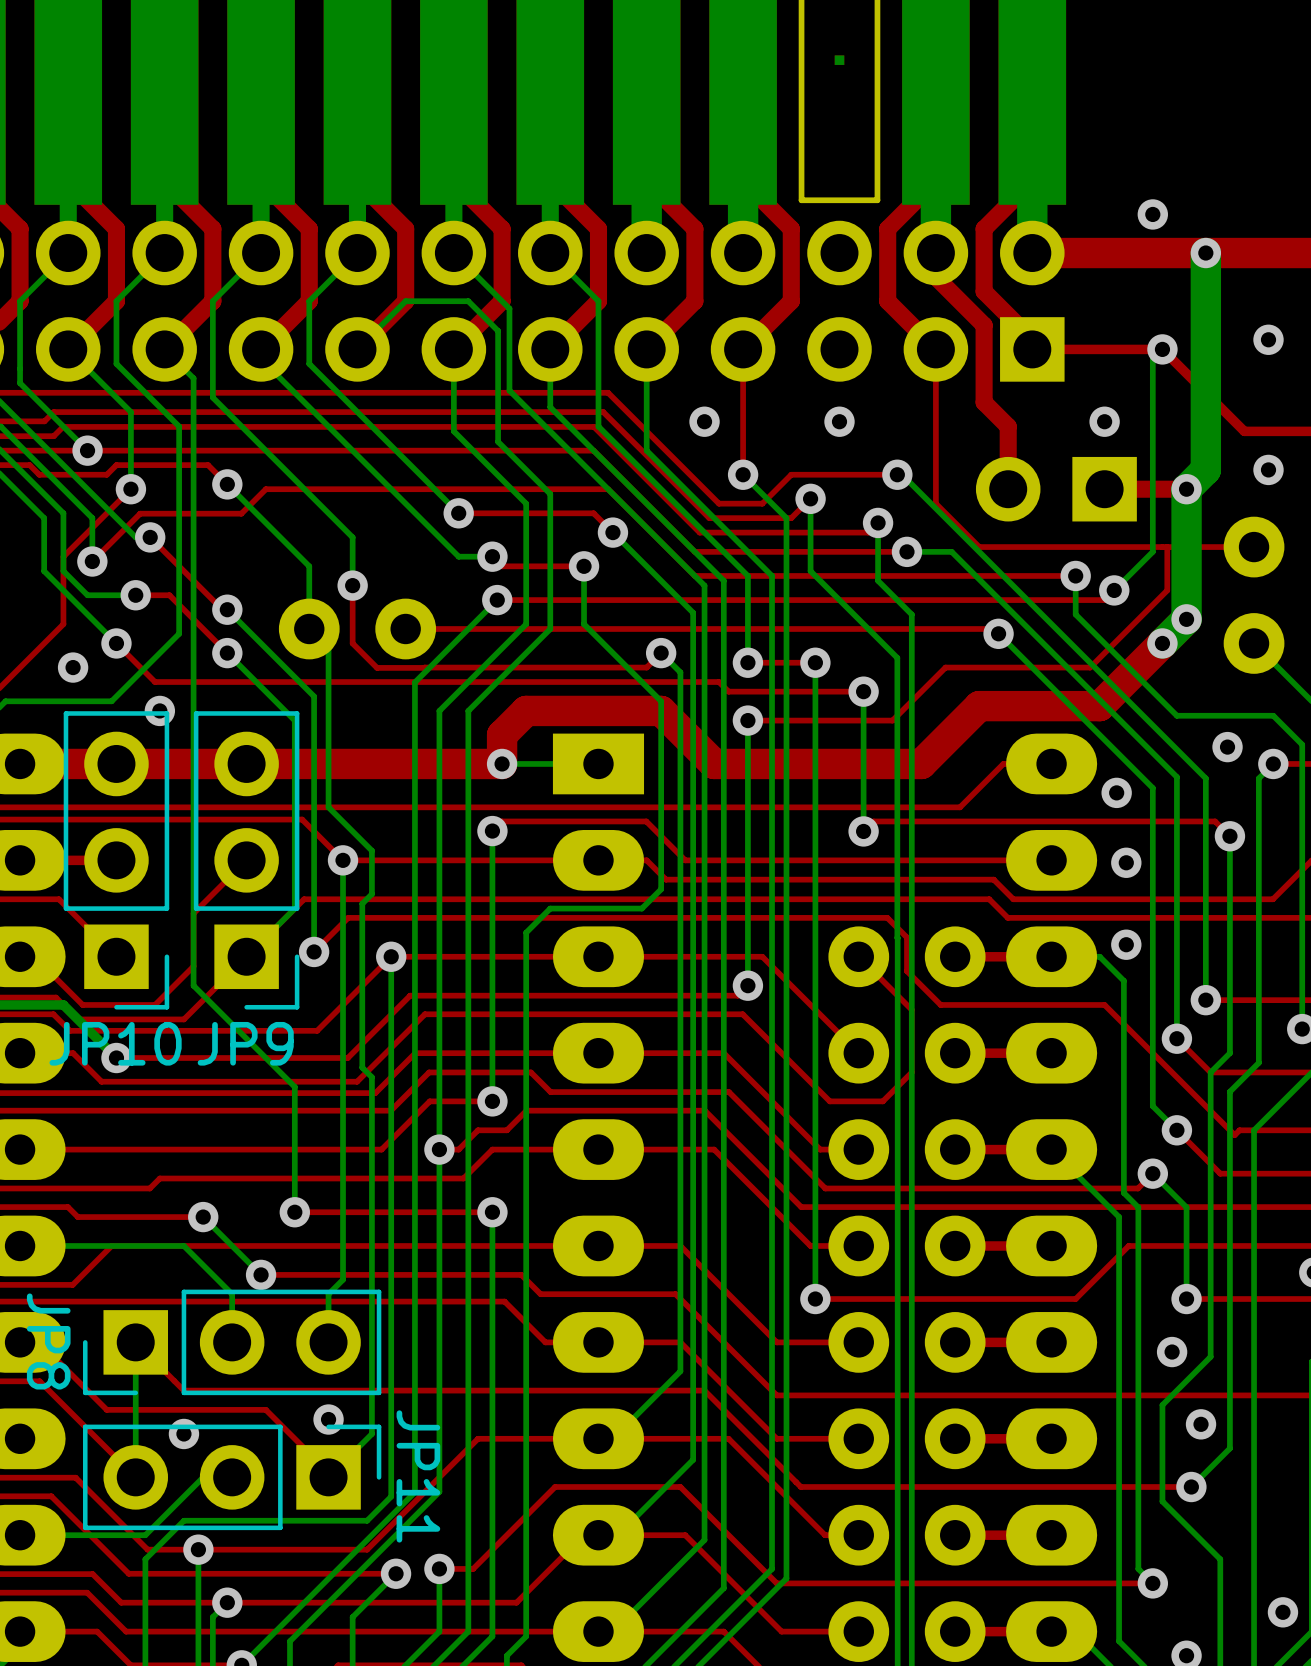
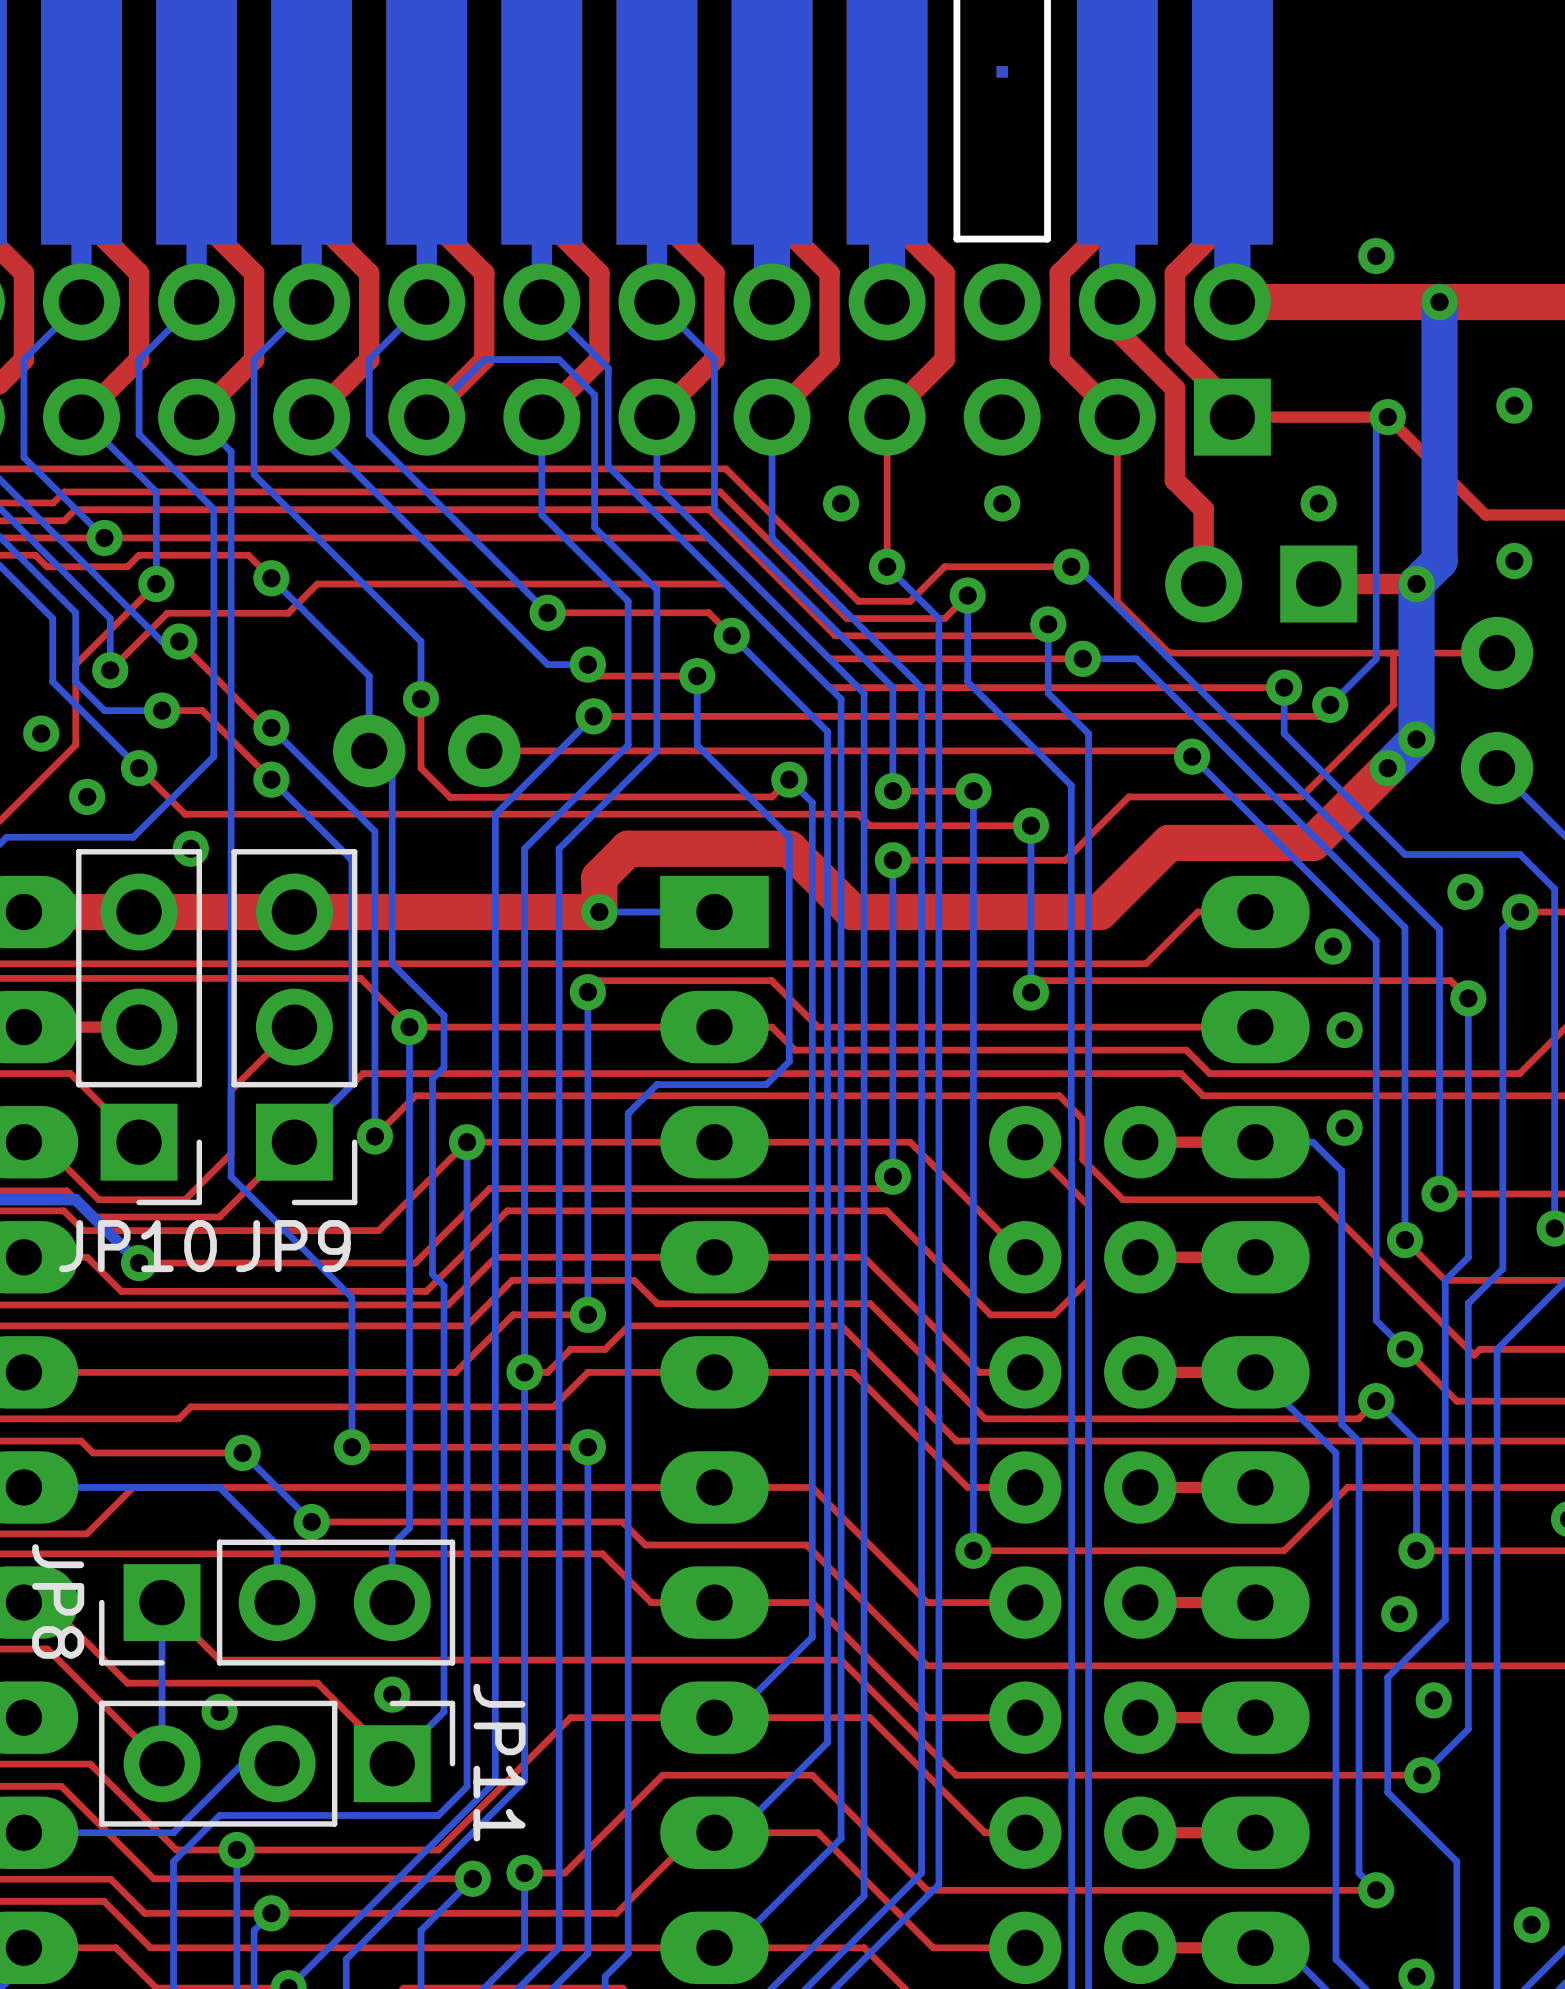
via: none -> (41, 733)

